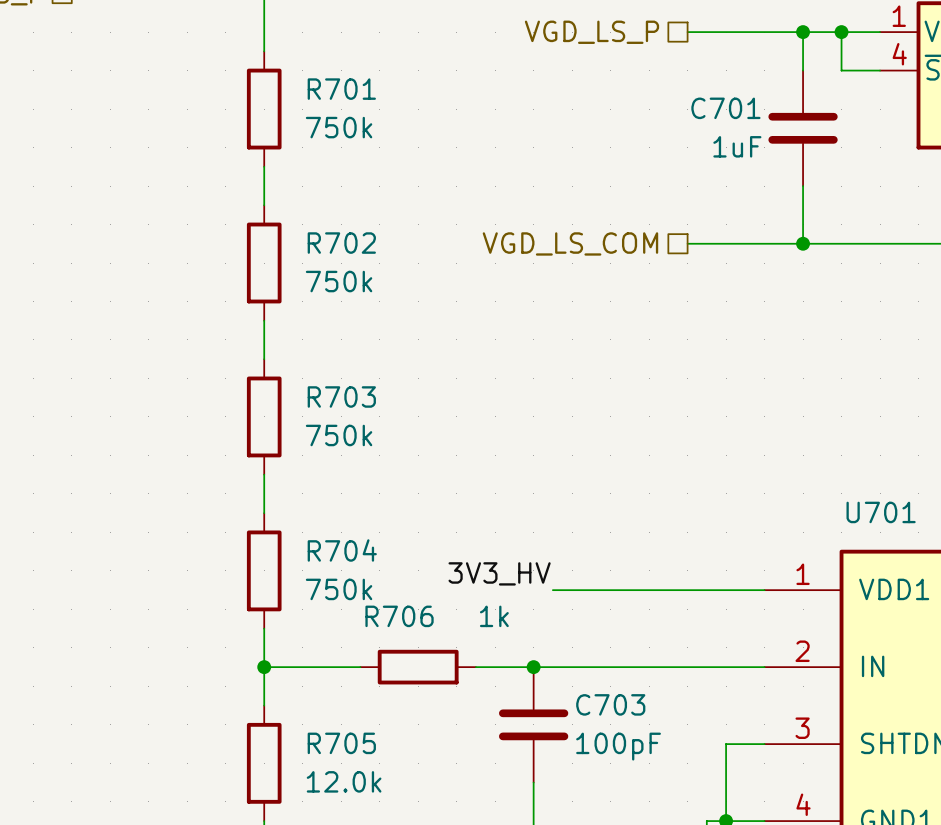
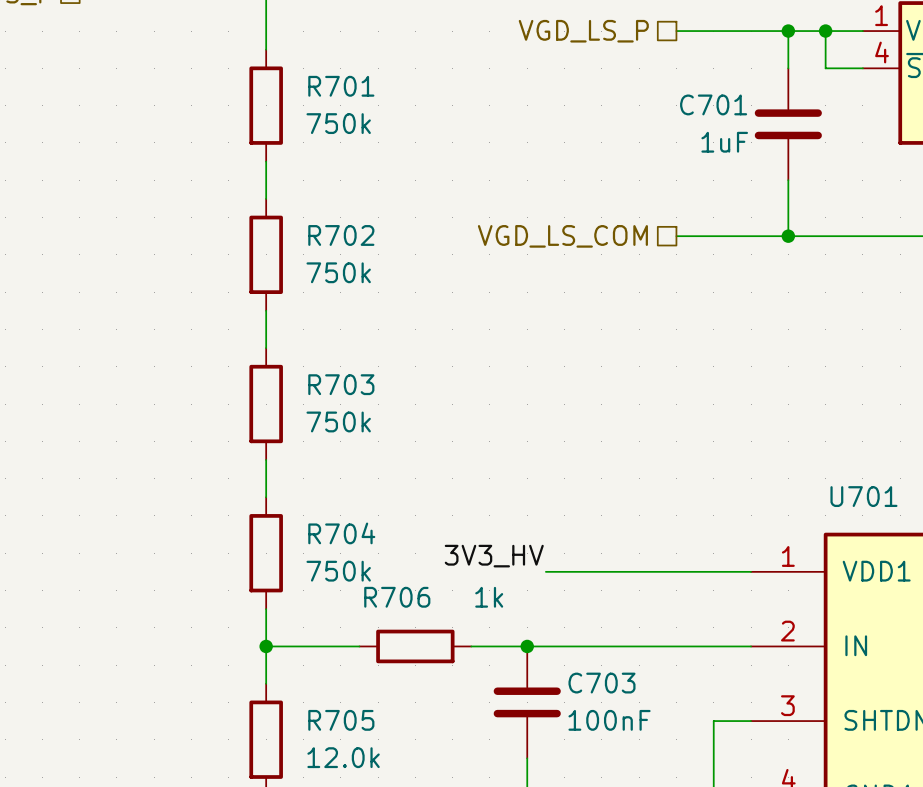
C703 value: 100pF (618, 746) -> 100nF (609, 720)

